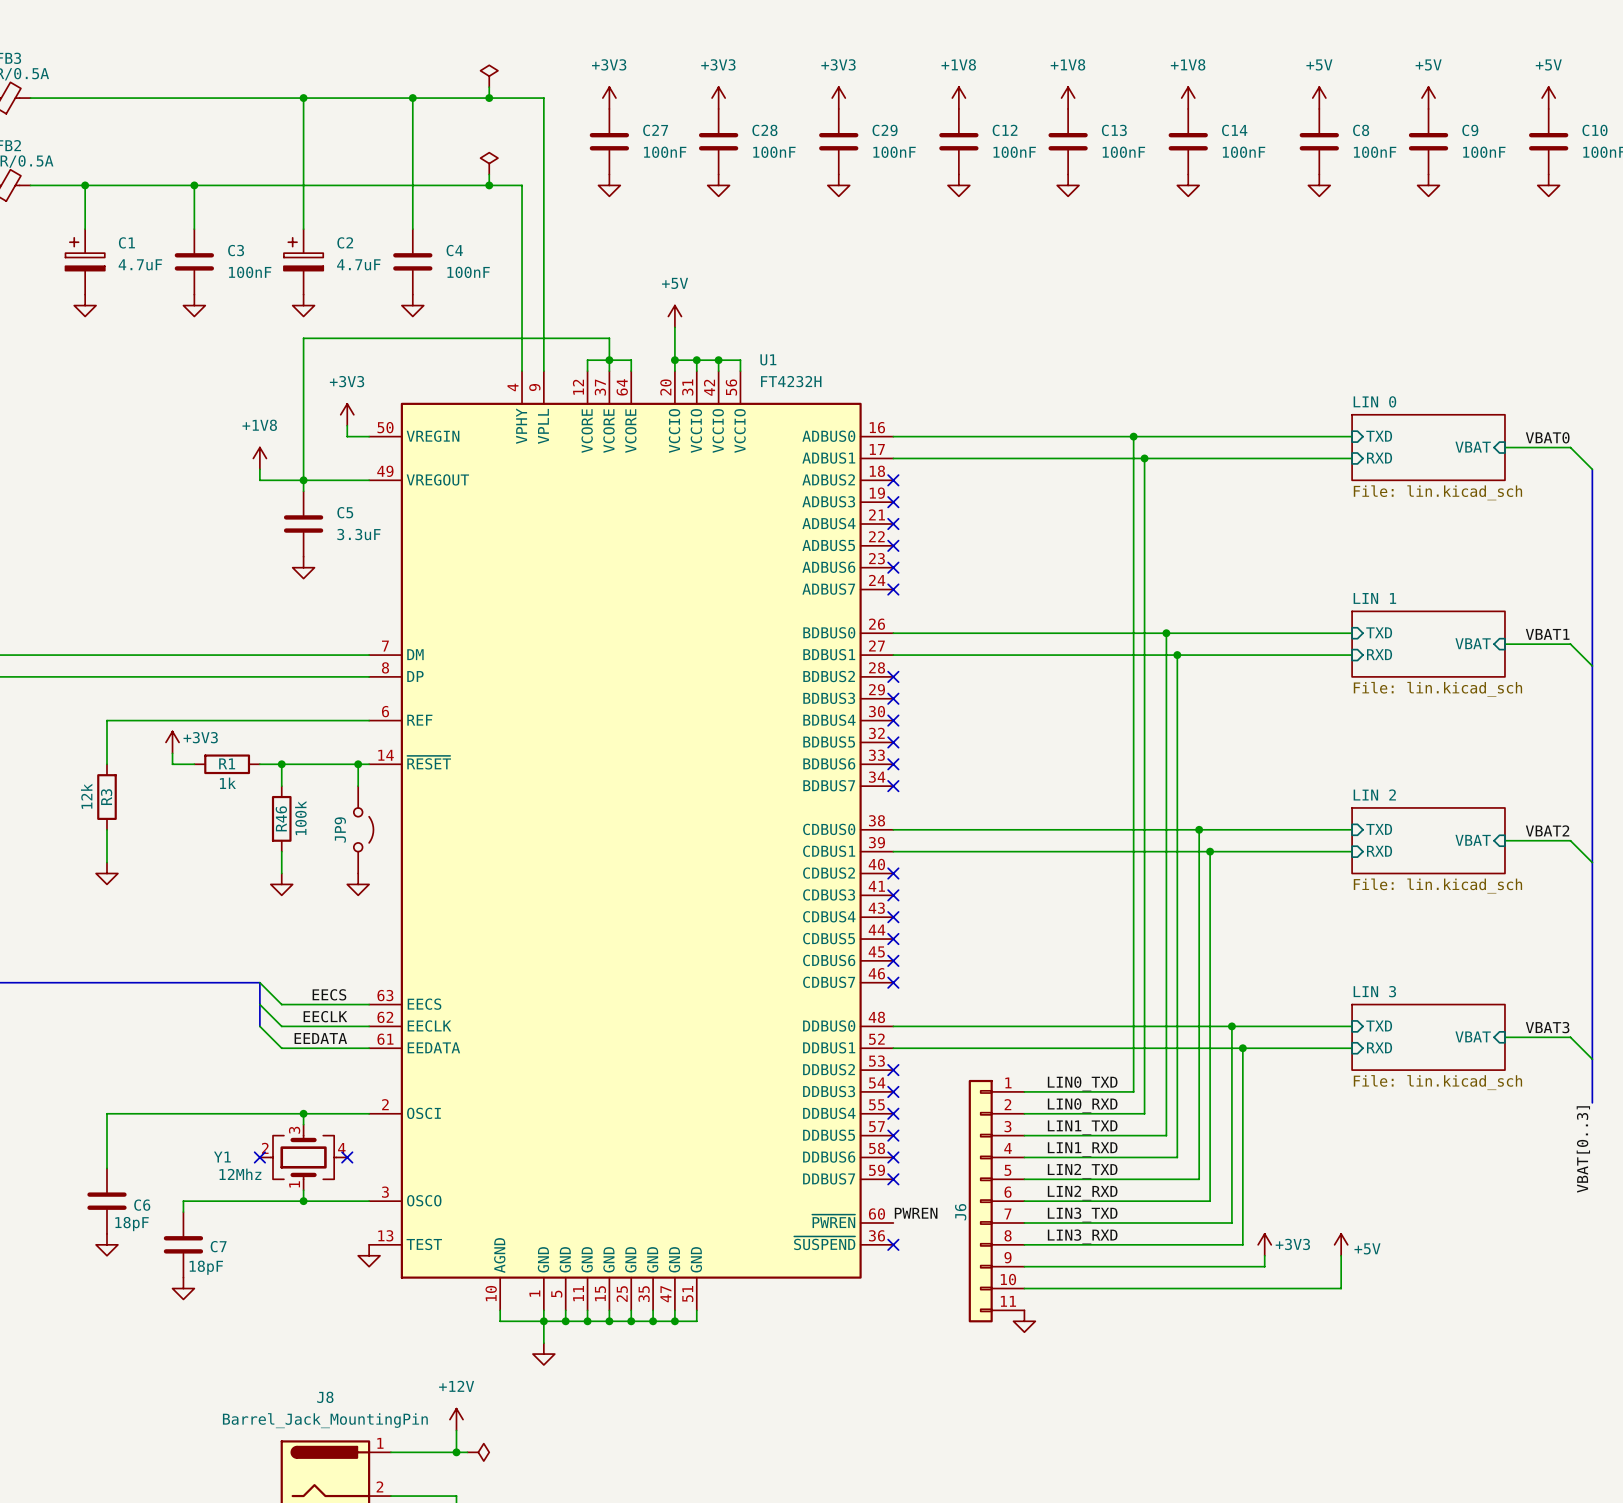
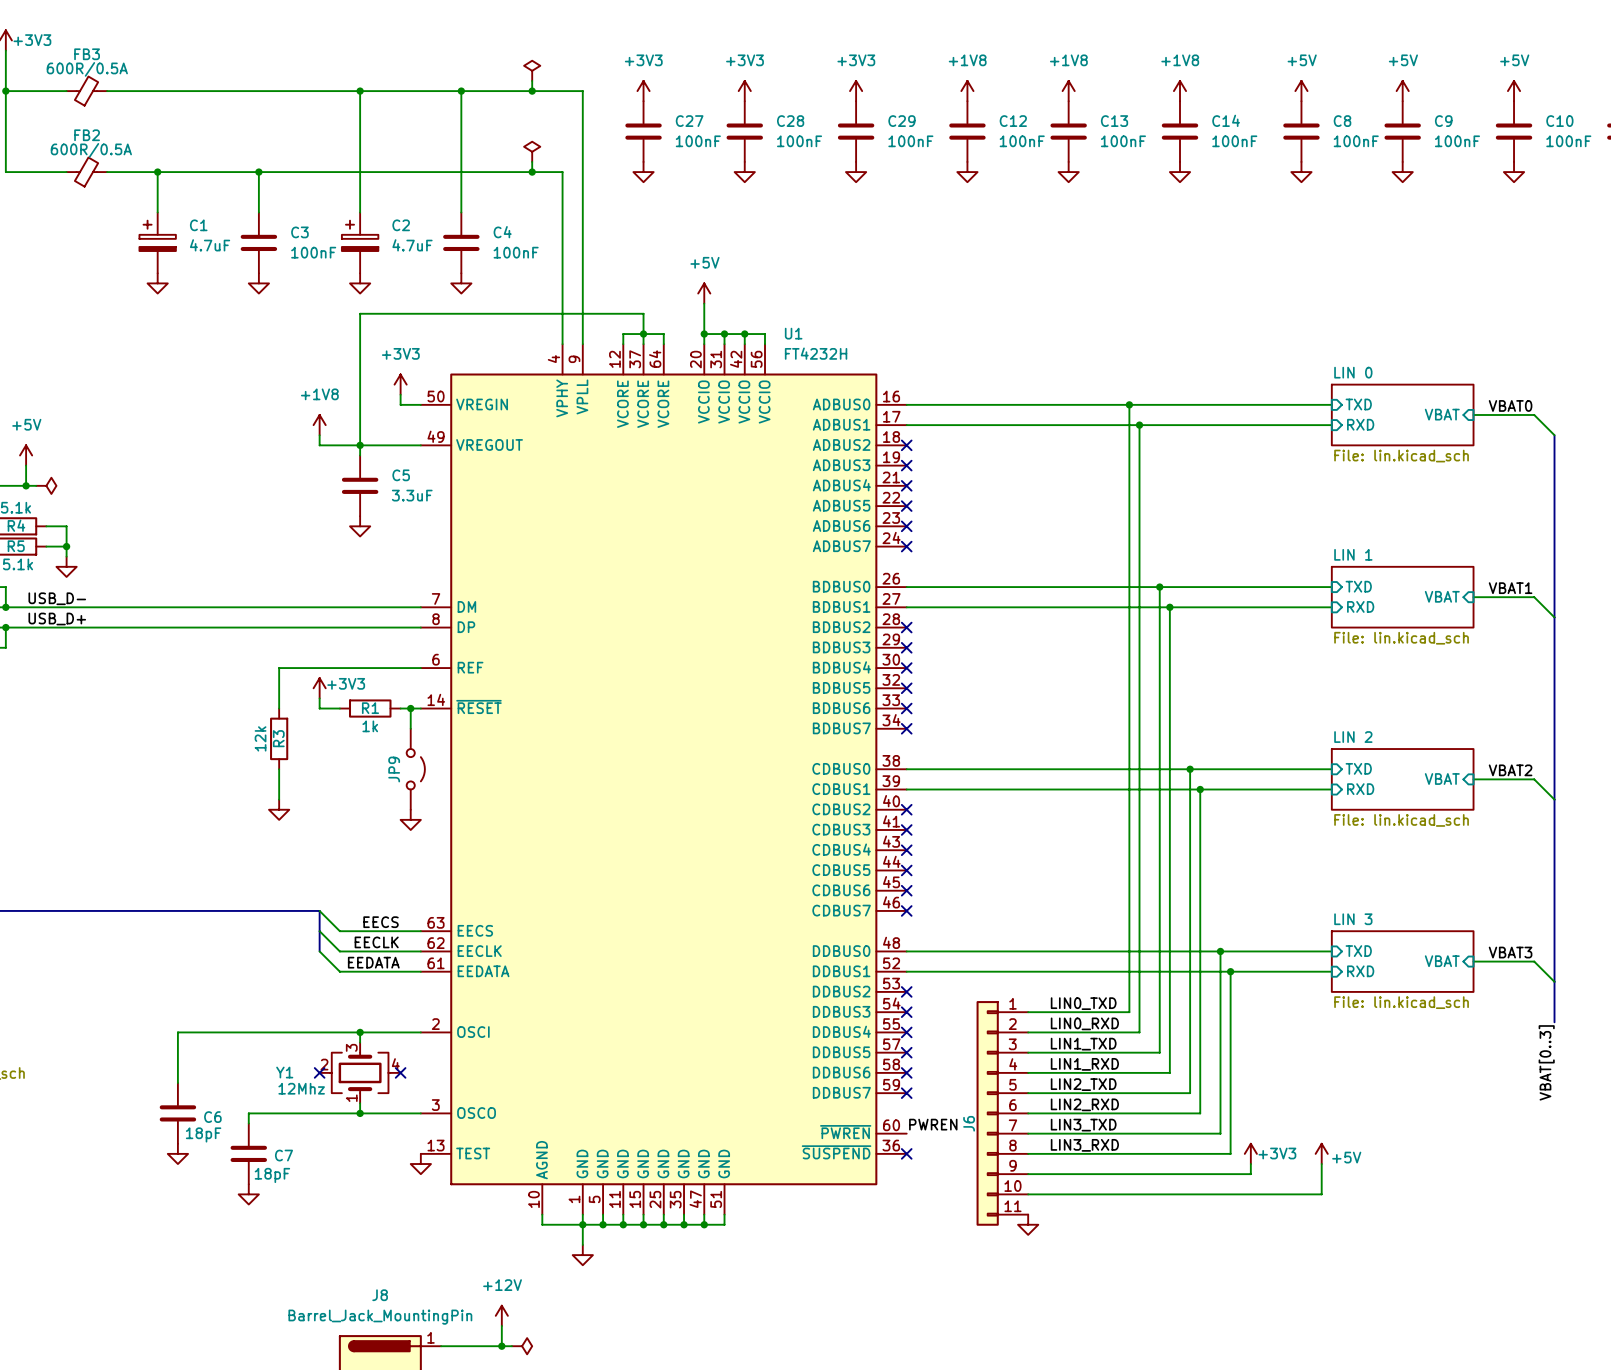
wire: (216, 720) (106, 720) (106, 764) -> (279, 668) (279, 708)
power symbol position: +3V3 (172, 742) -> +3V3 (319, 688)
wire: (172, 753) (172, 764) (194, 764) -> none
wire: none -> (319, 698) (319, 708)
R1 position: (227, 764) -> (370, 708)
junction: (281, 764) -> none
wire: (347, 764) (281, 764) (281, 786) -> none
R3 position: (106, 797) -> (279, 738)
R46: 100k (281, 818) -> none
wire: (106, 829) (106, 862) -> (279, 769) (279, 799)
wire: (281, 851) (281, 873) -> none
power symbol: (106, 873) -> none
power symbol: none -> (279, 809)
power symbol: (281, 884) -> none

